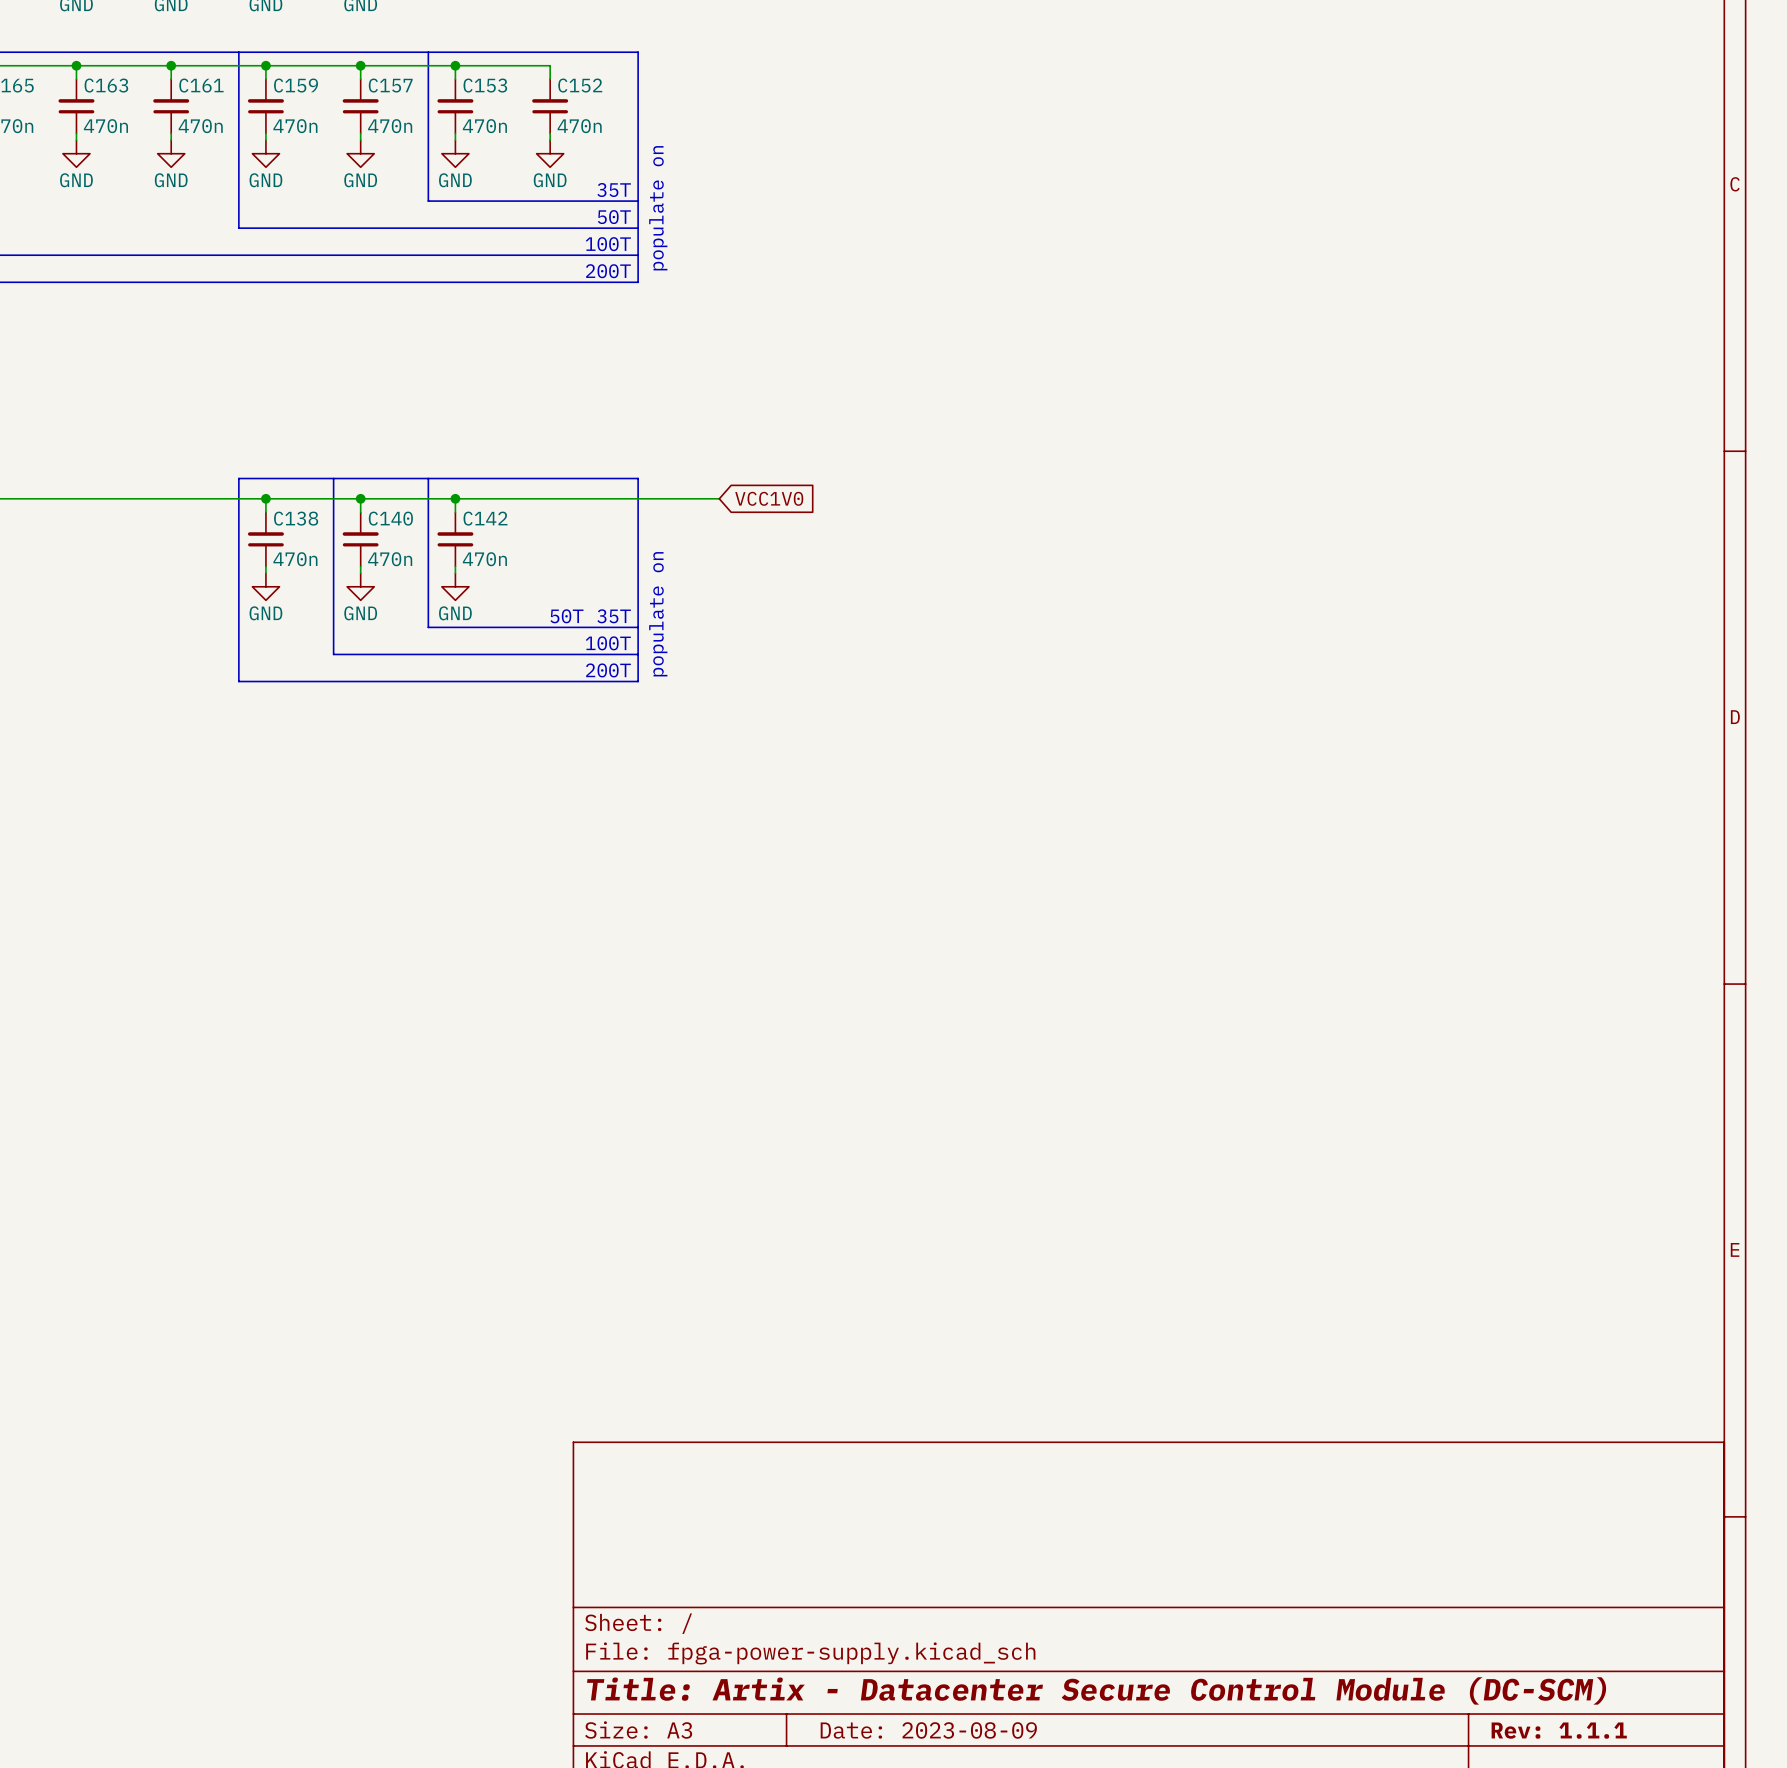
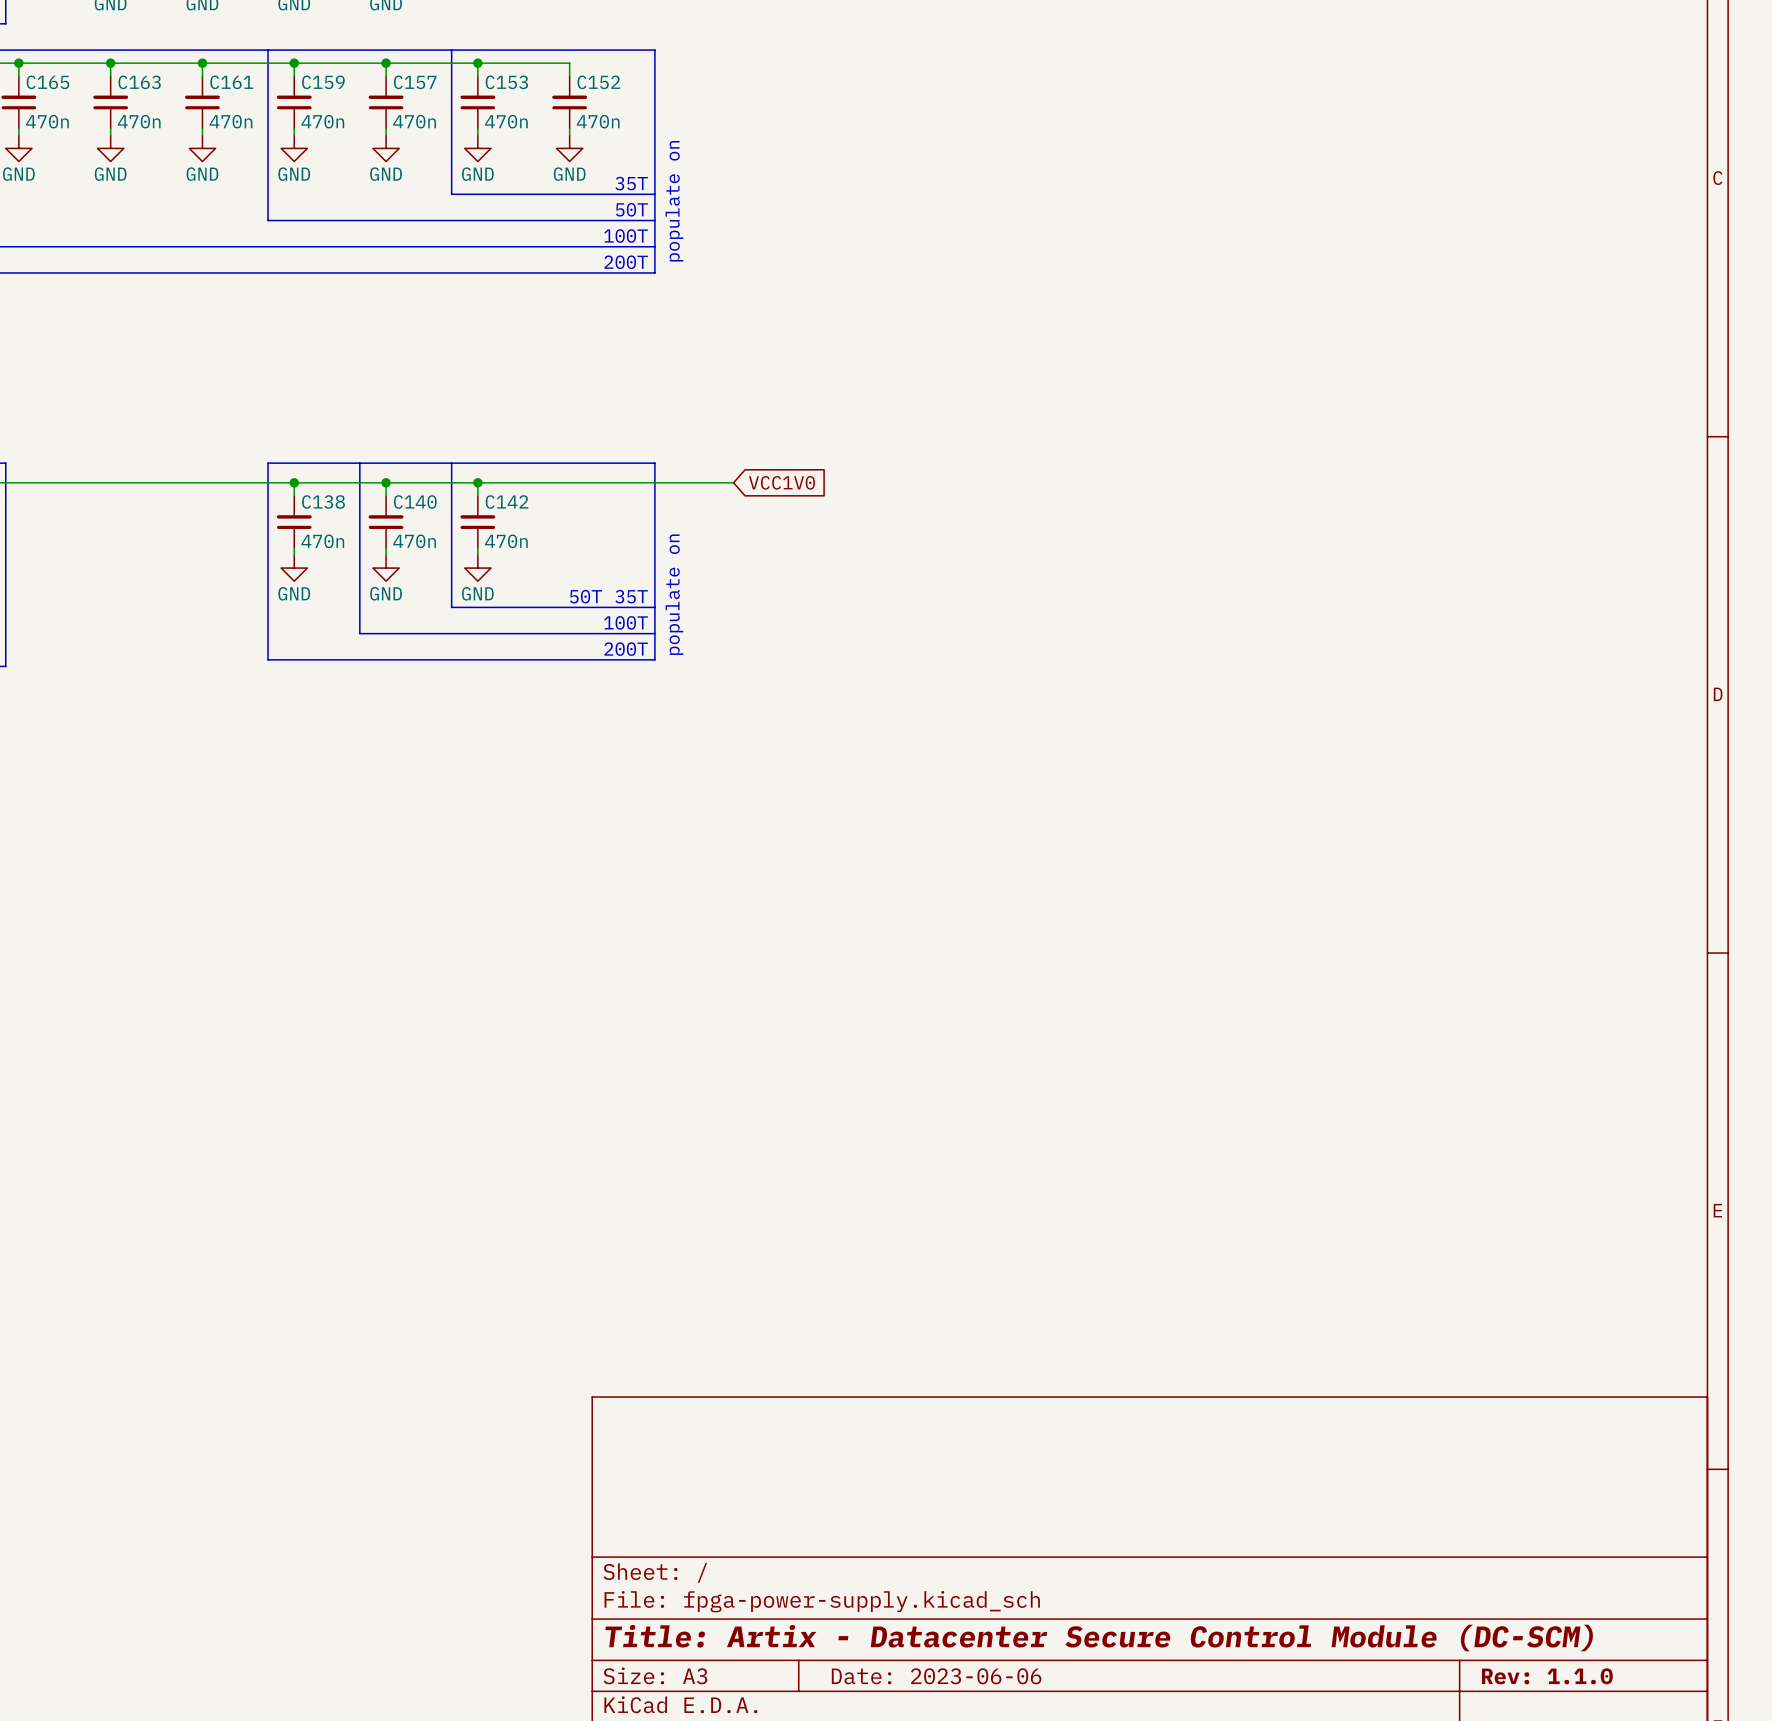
title block: Date: 2023-08-09 (928, 1730) -> Date: 2023-06-06 (936, 1676)
title block: Rev: 1.1.1 (1559, 1730) -> Rev: 1.1.0 (1547, 1676)

